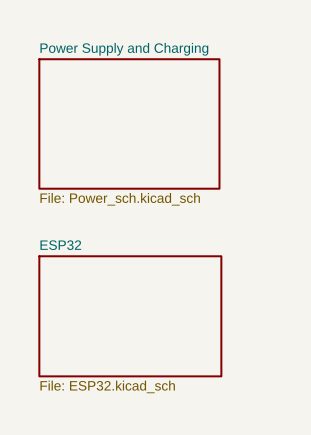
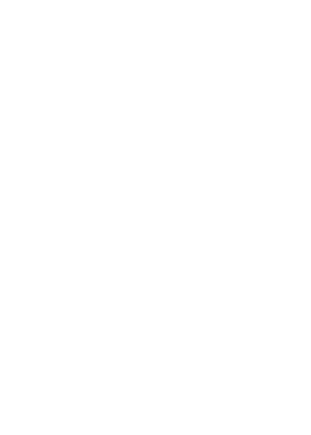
sheet Power Supply and Charging: File: Power_sch.kicad_sch (129, 123) -> none
sheet ESP32: File: ESP32.kicad_sch (130, 316) -> none

